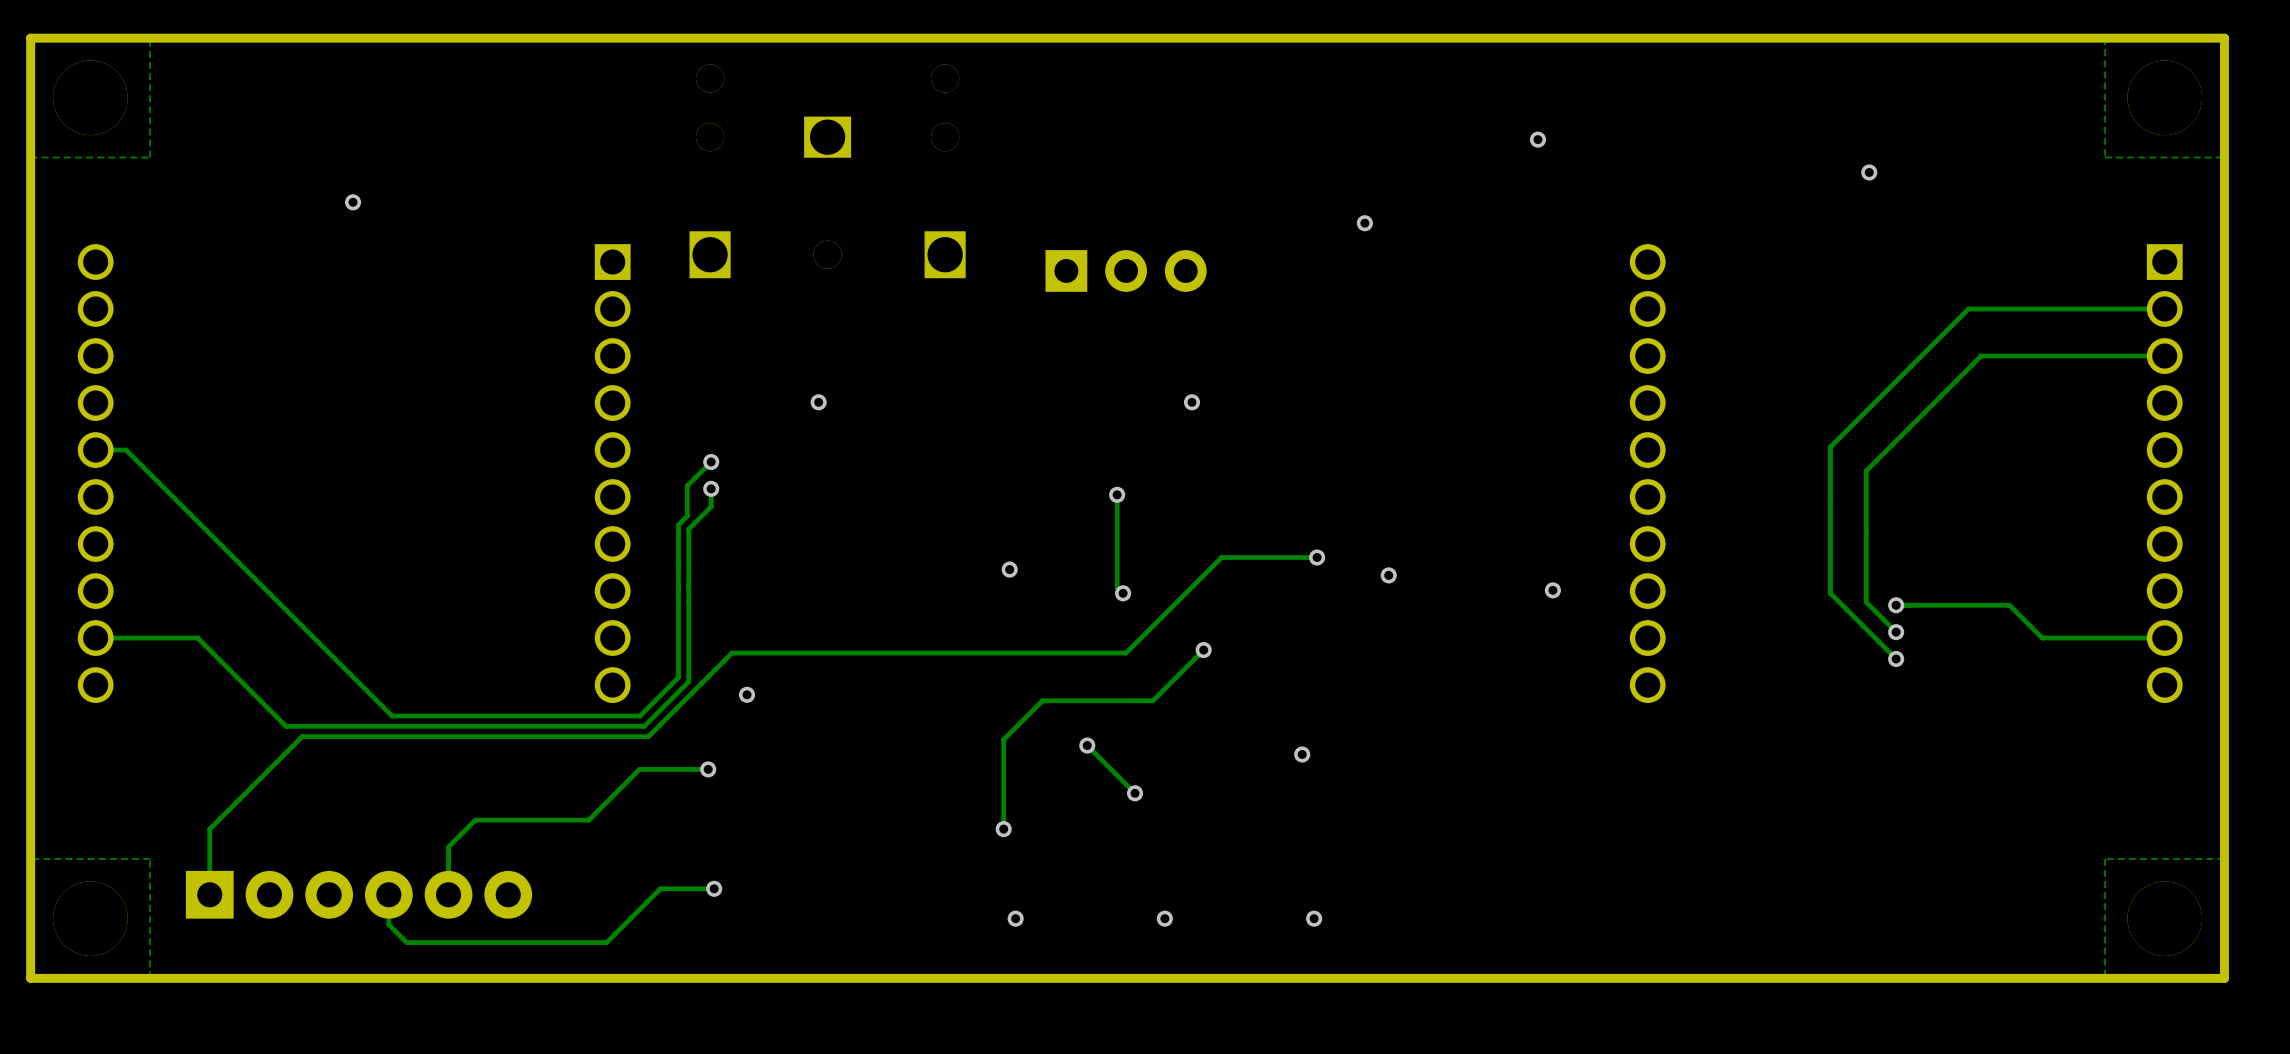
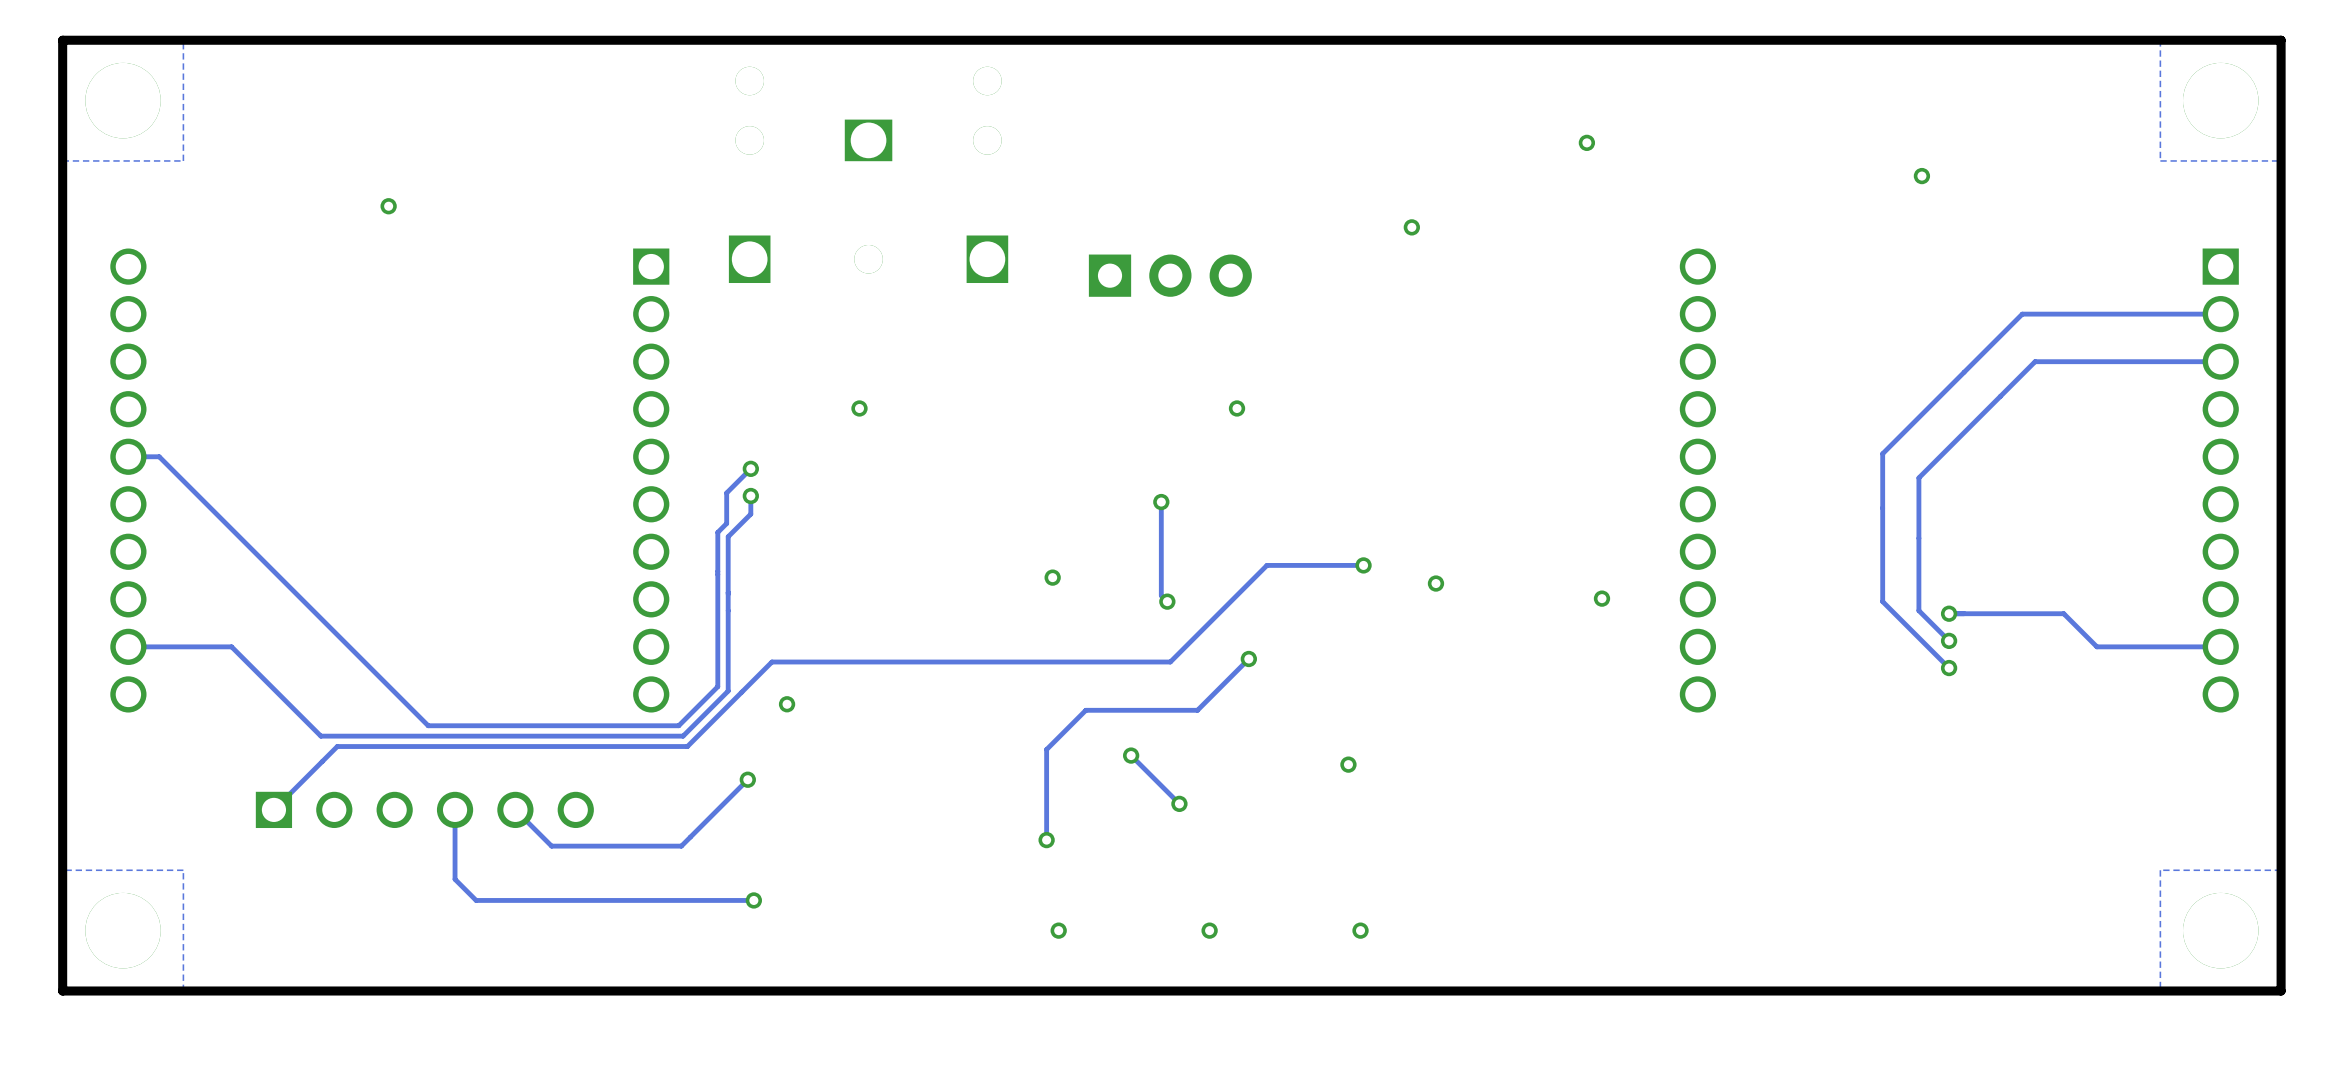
track: (708, 769) (639, 769) (588, 820) (475, 820) (448, 847) (448, 894) -> (747, 779) (681, 846) (551, 846) (515, 809)
track: (239, 799) (209, 829) (209, 894) -> none
part: none -> (424, 809)
track: (660, 888) (606, 942) (406, 942) (388, 924) (388, 894) -> (699, 900) (476, 900) (455, 879) (455, 809)
part: (359, 894) -> none

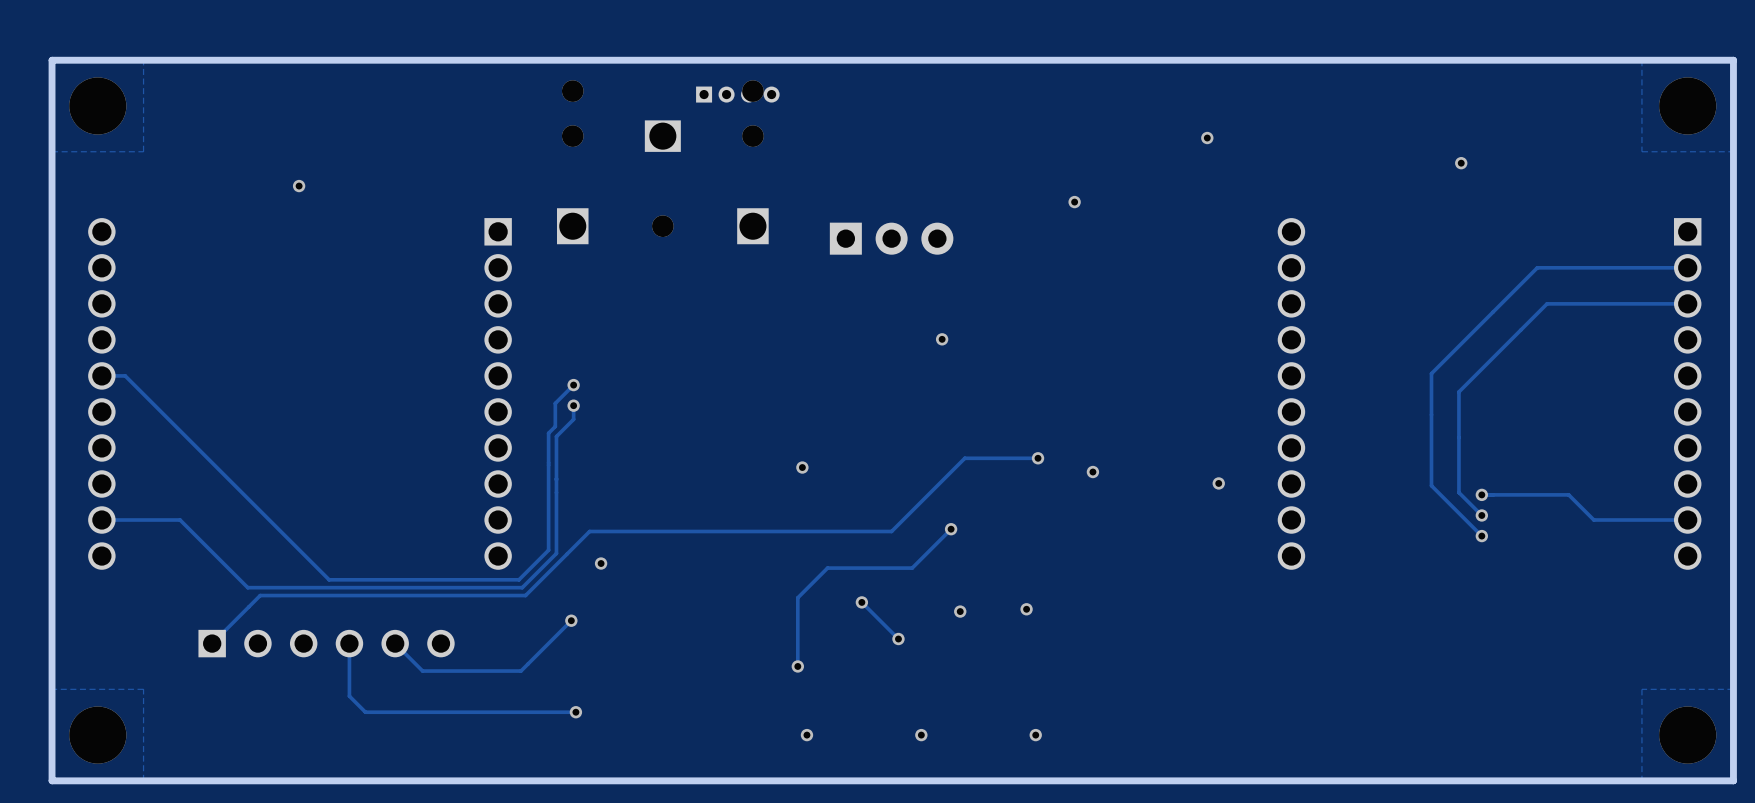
part: none -> (737, 94)
via: (859, 408) -> none
track: (1161, 502) (1161, 595) (1167, 601) -> none
via: (1161, 502) -> none
via: (1167, 601) -> none
via: none -> (960, 611)

